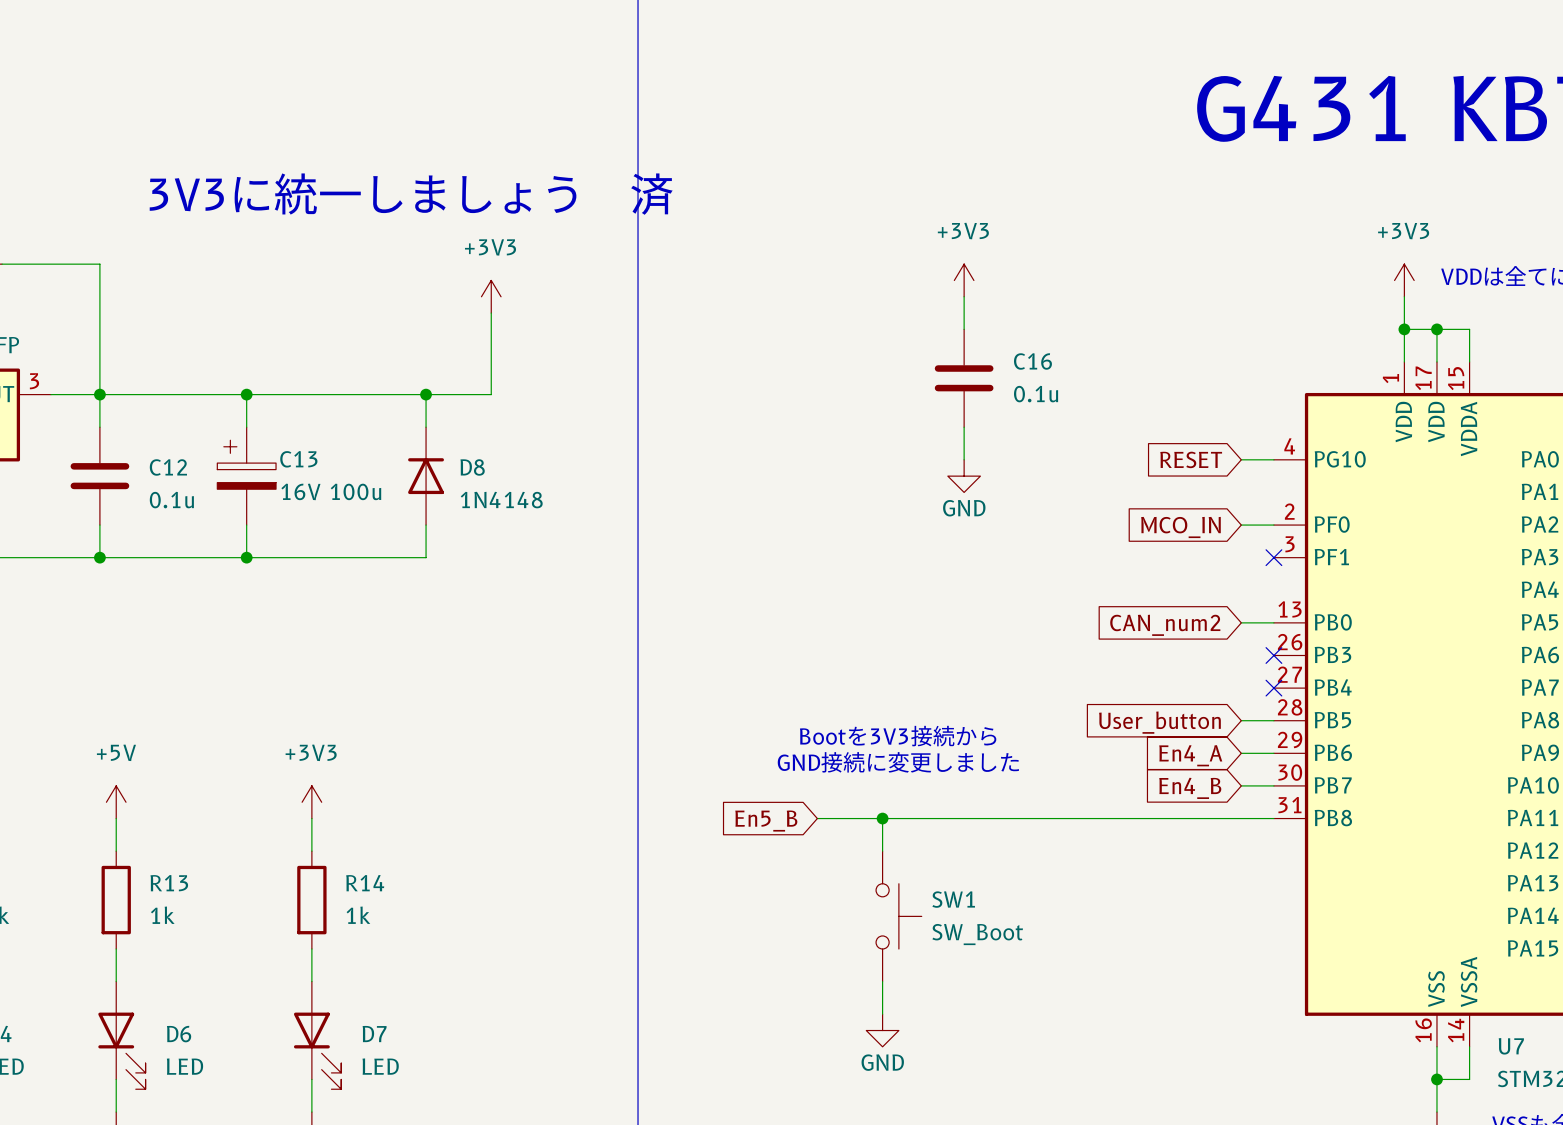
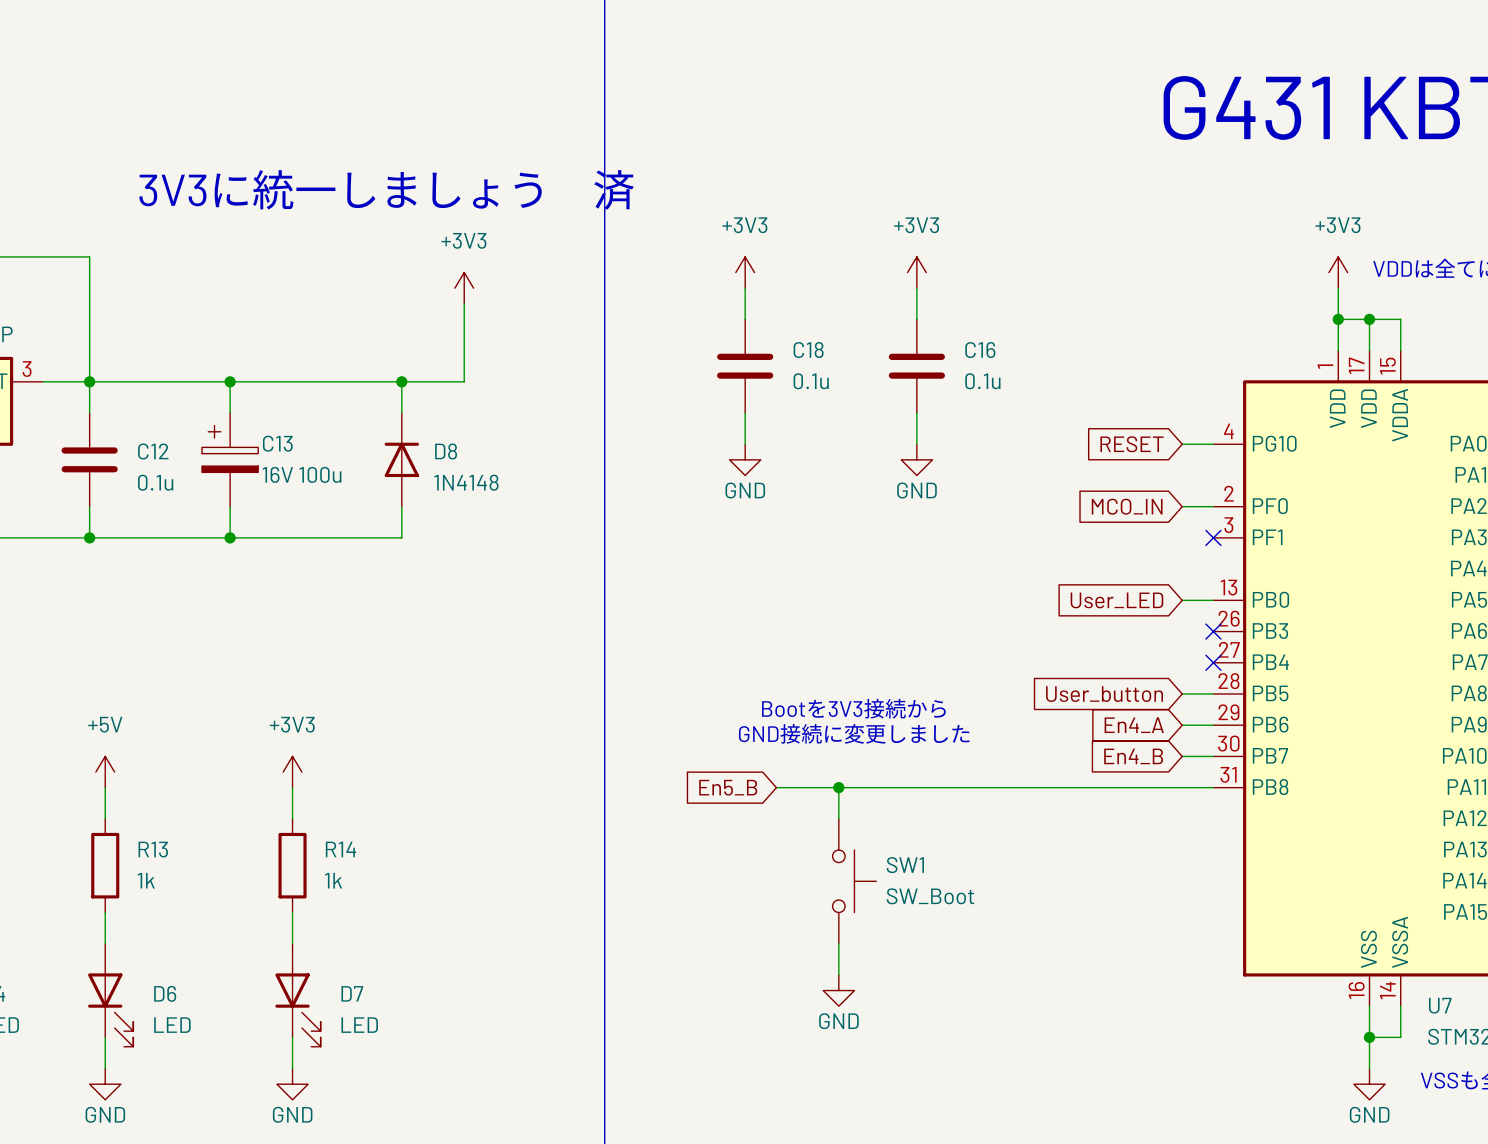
power symbol: none -> +3V3 (745, 272)
wire: none -> (745, 288) (745, 319)
C18: none -> 0.1u (745, 366)
wire: none -> (745, 413) (745, 444)
power symbol: none -> GND (745, 459)
global label: CAN_num2 (1165, 625) -> User_LED (1116, 600)

